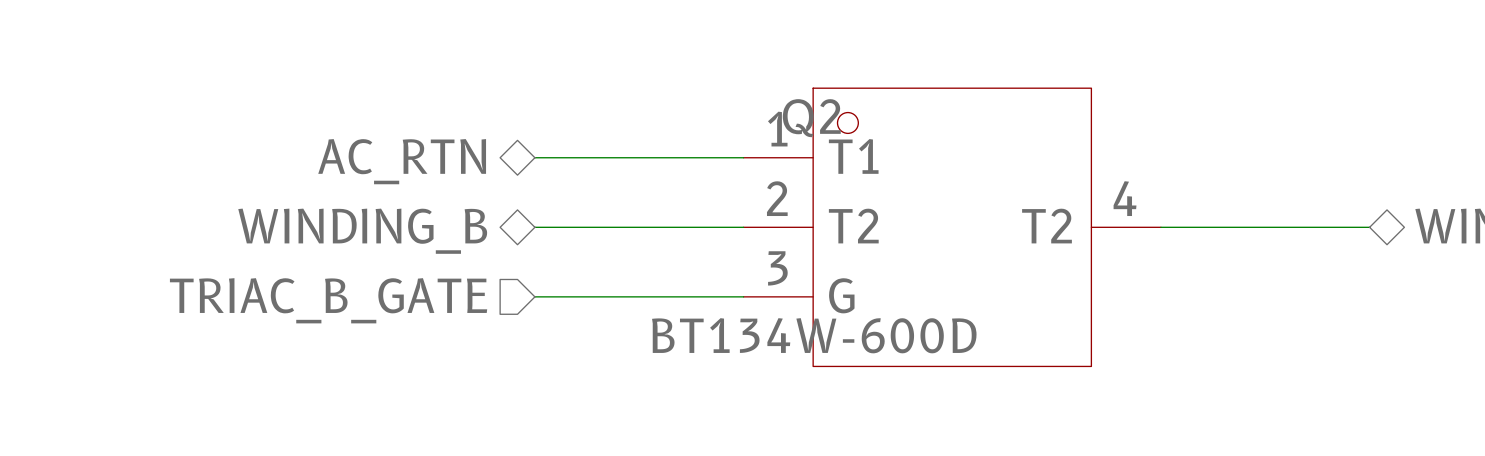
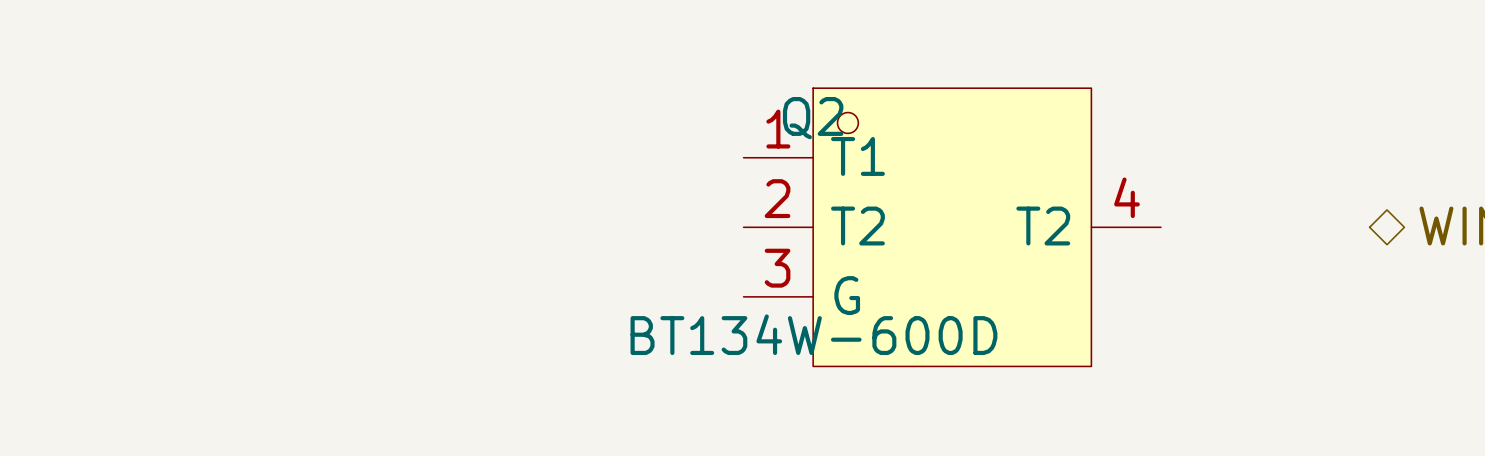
wire: (534, 157) (743, 157) -> none
hierarchical label: AC_RTN (402, 161) -> none
wire: (534, 227) (743, 227) -> none
wire: (1160, 227) (1369, 227) -> none
hierarchical label: WINDING_B (362, 231) -> none
wire: (534, 296) (743, 296) -> none
hierarchical label: TRIAC_B_GATE (328, 300) -> none

